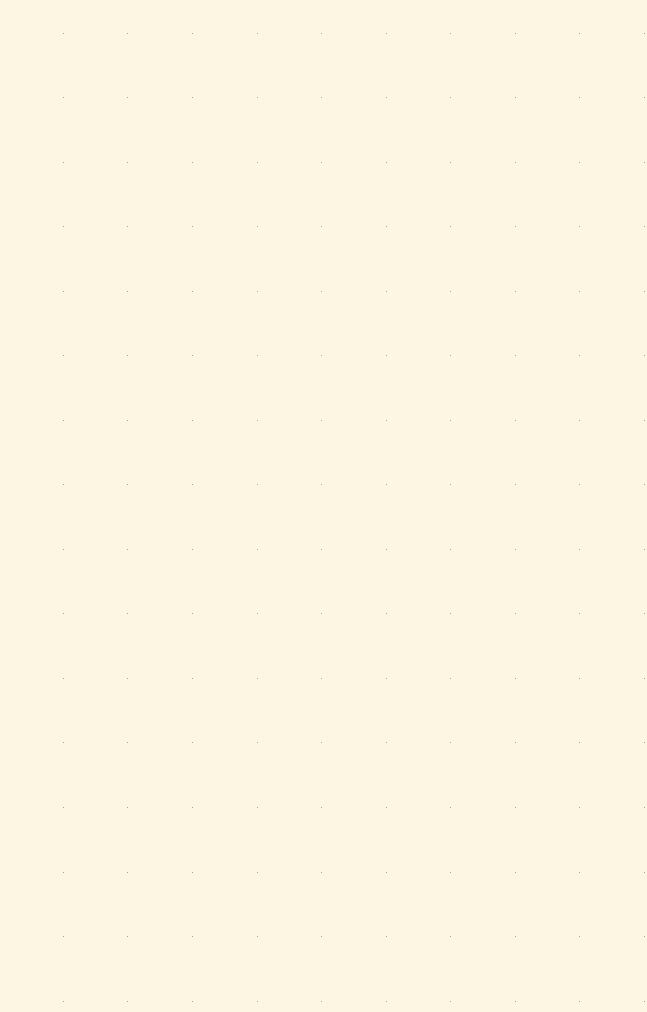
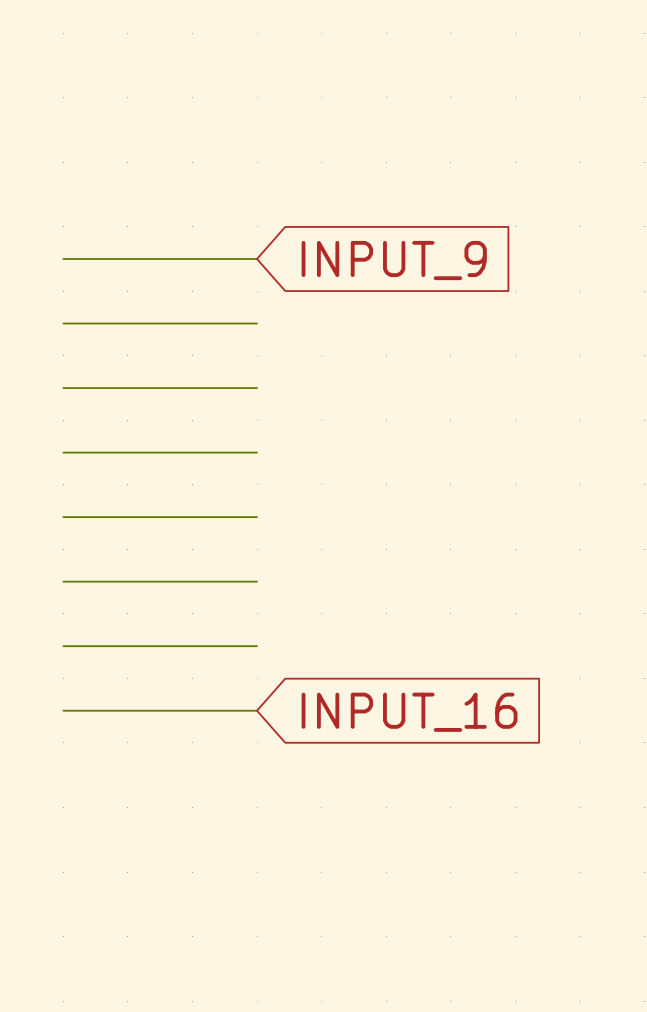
wire: none -> (63, 258) (257, 258)
global label: none -> INPUT_9 (394, 260)
wire: none -> (63, 323) (257, 323)
wire: none -> (63, 388) (257, 388)
wire: none -> (63, 452) (257, 452)
wire: none -> (63, 517) (257, 517)
wire: none -> (63, 581) (257, 581)
wire: none -> (63, 646) (257, 646)
wire: none -> (63, 710) (257, 710)
global label: none -> INPUT_16 (409, 712)

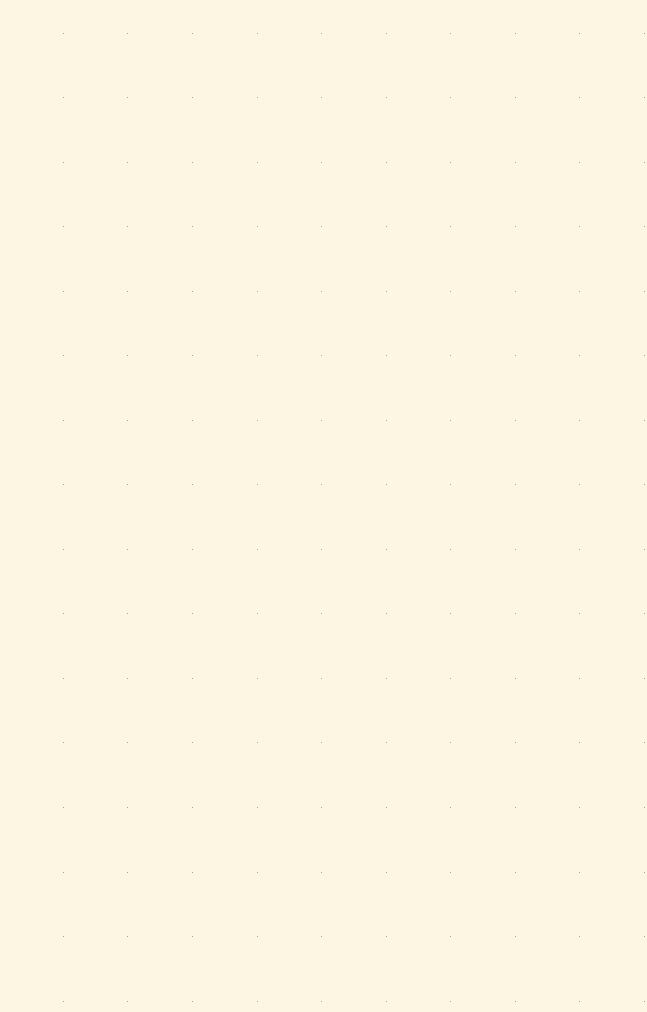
wire: (63, 258) (257, 258) -> none
global label: INPUT_9 (394, 260) -> none
wire: (63, 323) (257, 323) -> none
wire: (63, 388) (257, 388) -> none
wire: (63, 452) (257, 452) -> none
wire: (63, 517) (257, 517) -> none
wire: (63, 581) (257, 581) -> none
wire: (63, 646) (257, 646) -> none
wire: (63, 710) (257, 710) -> none
global label: INPUT_16 (409, 712) -> none

